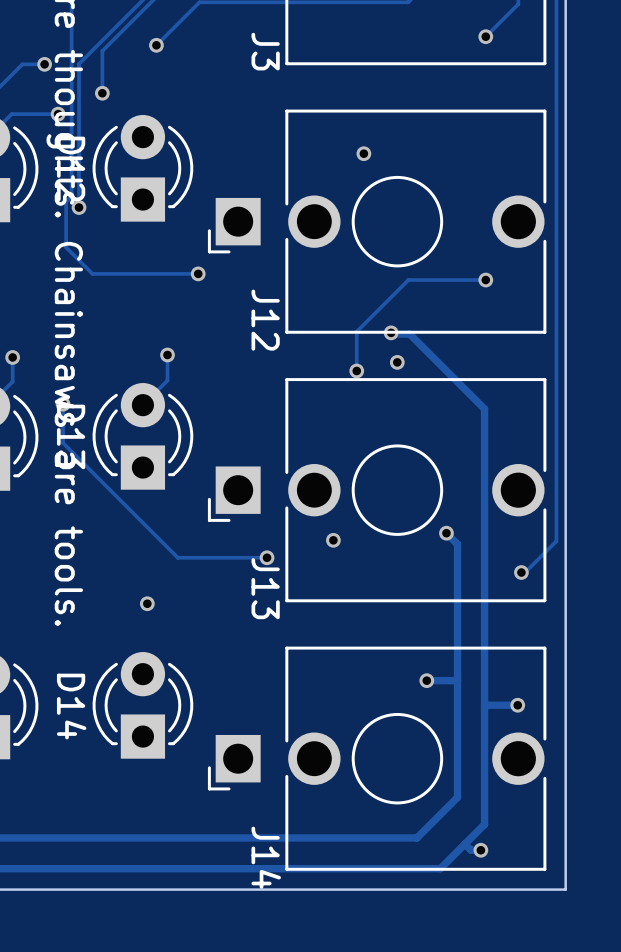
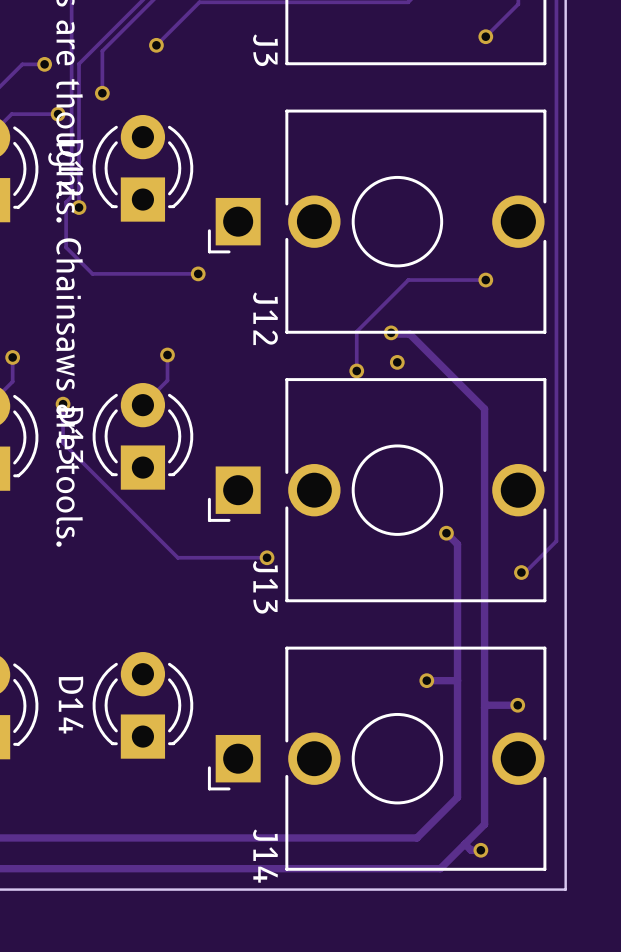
via: (363, 153) -> none
via: (333, 540) -> none
via: (147, 603) -> none

